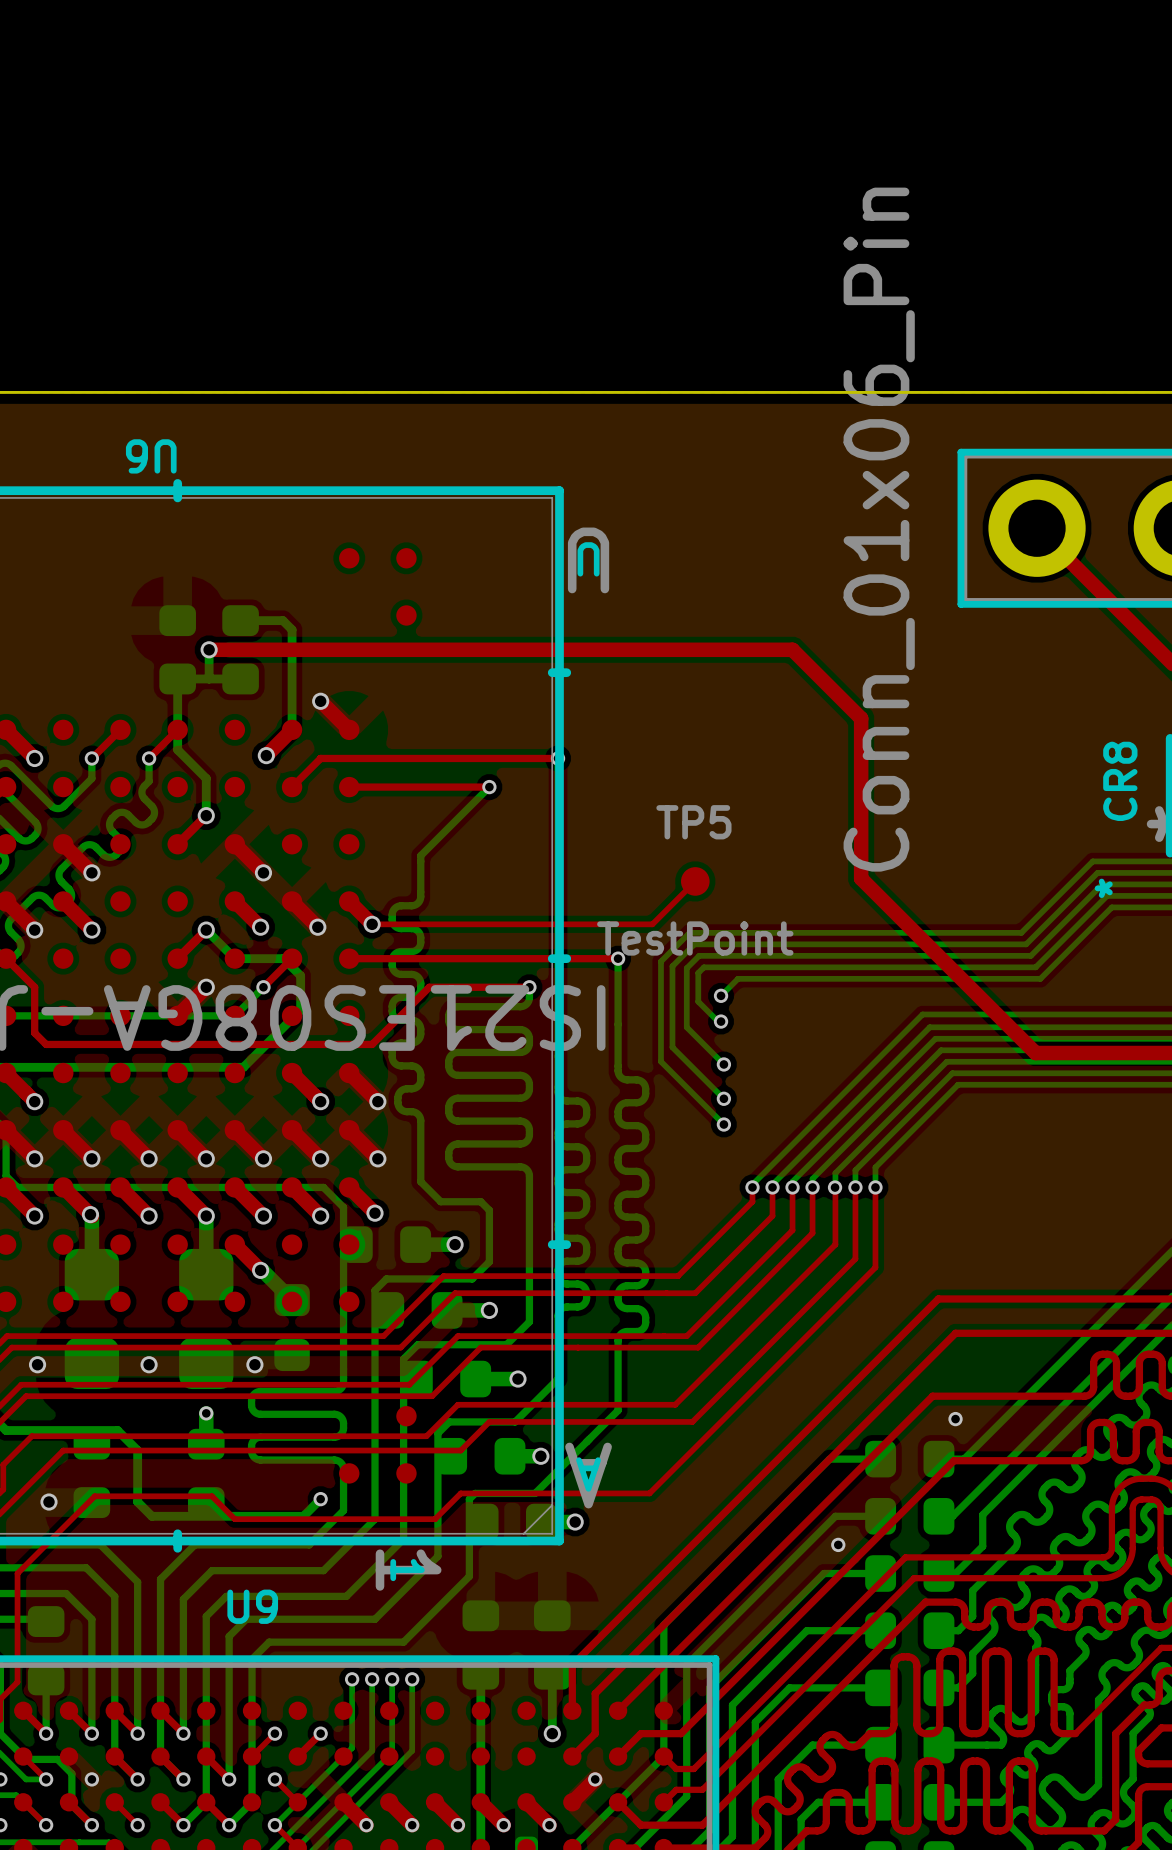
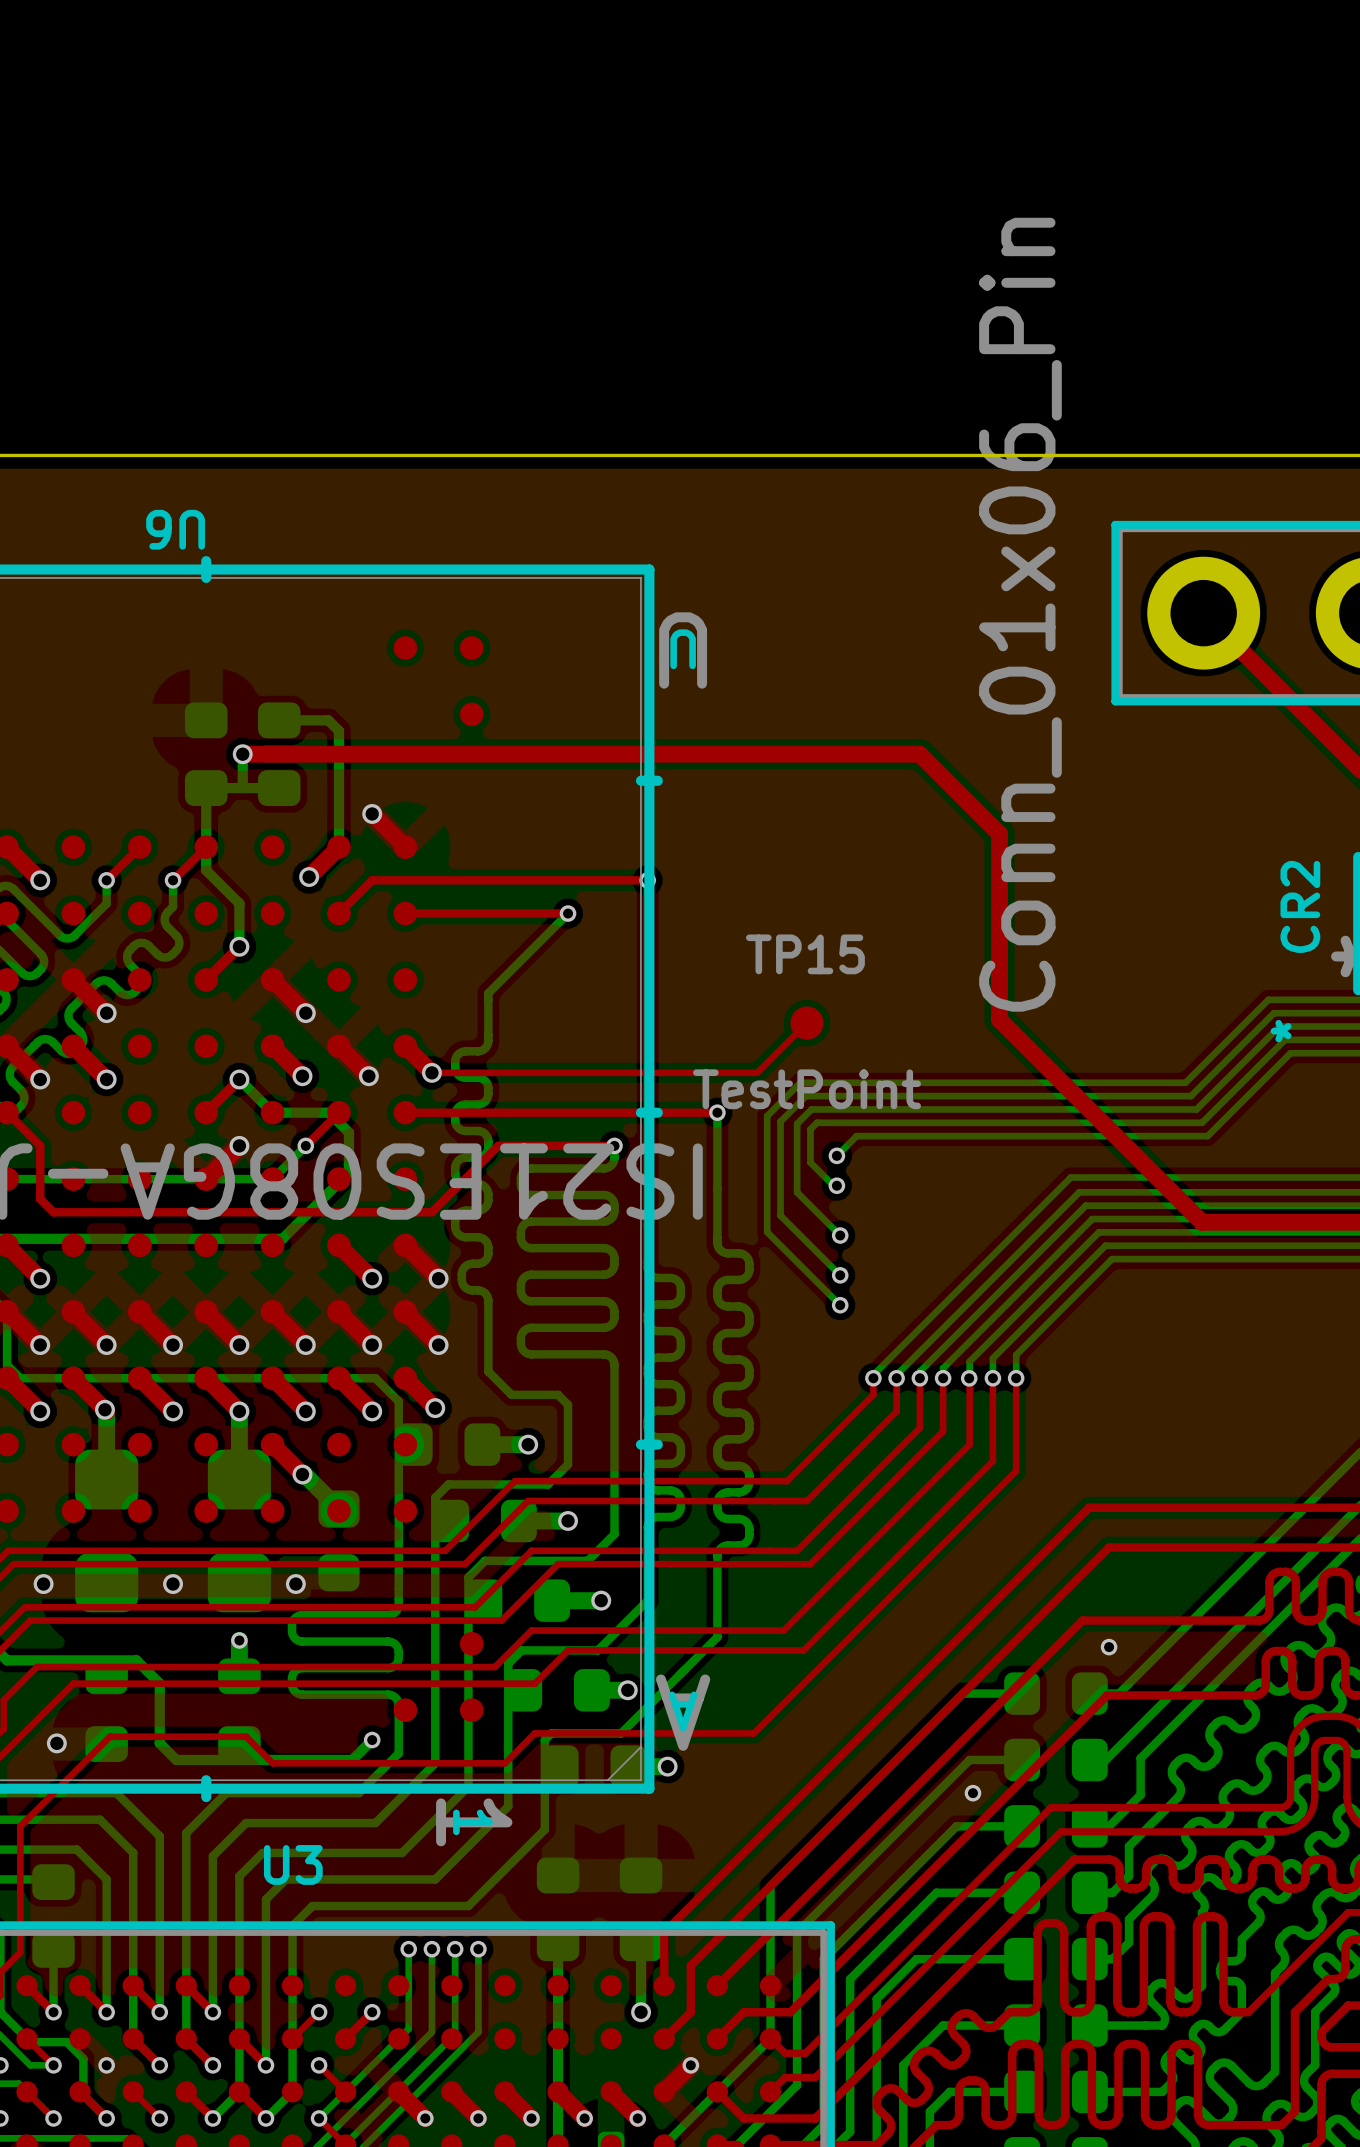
CR8 name: CR8 (1120, 781) -> CR2 (1300, 906)
TP5 name: TP5 (693, 822) -> TP15 (805, 954)
U9 name: U9 (252, 1606) -> U3 (293, 1864)

